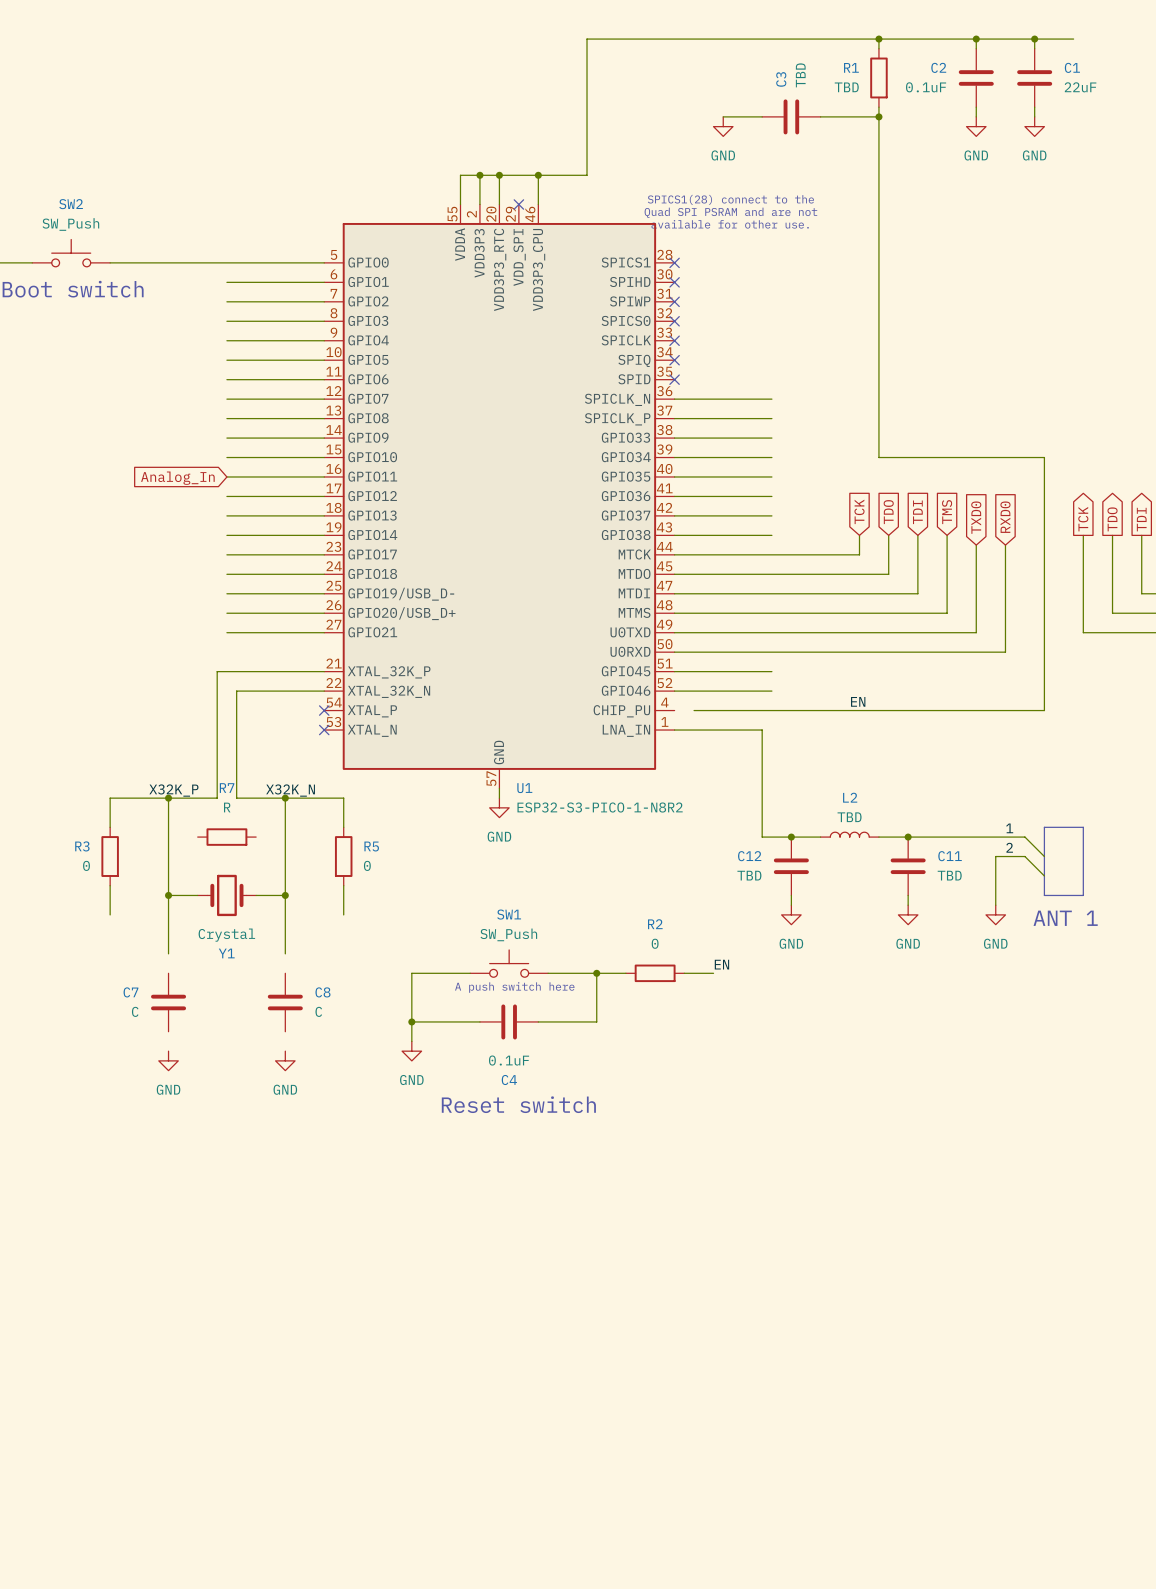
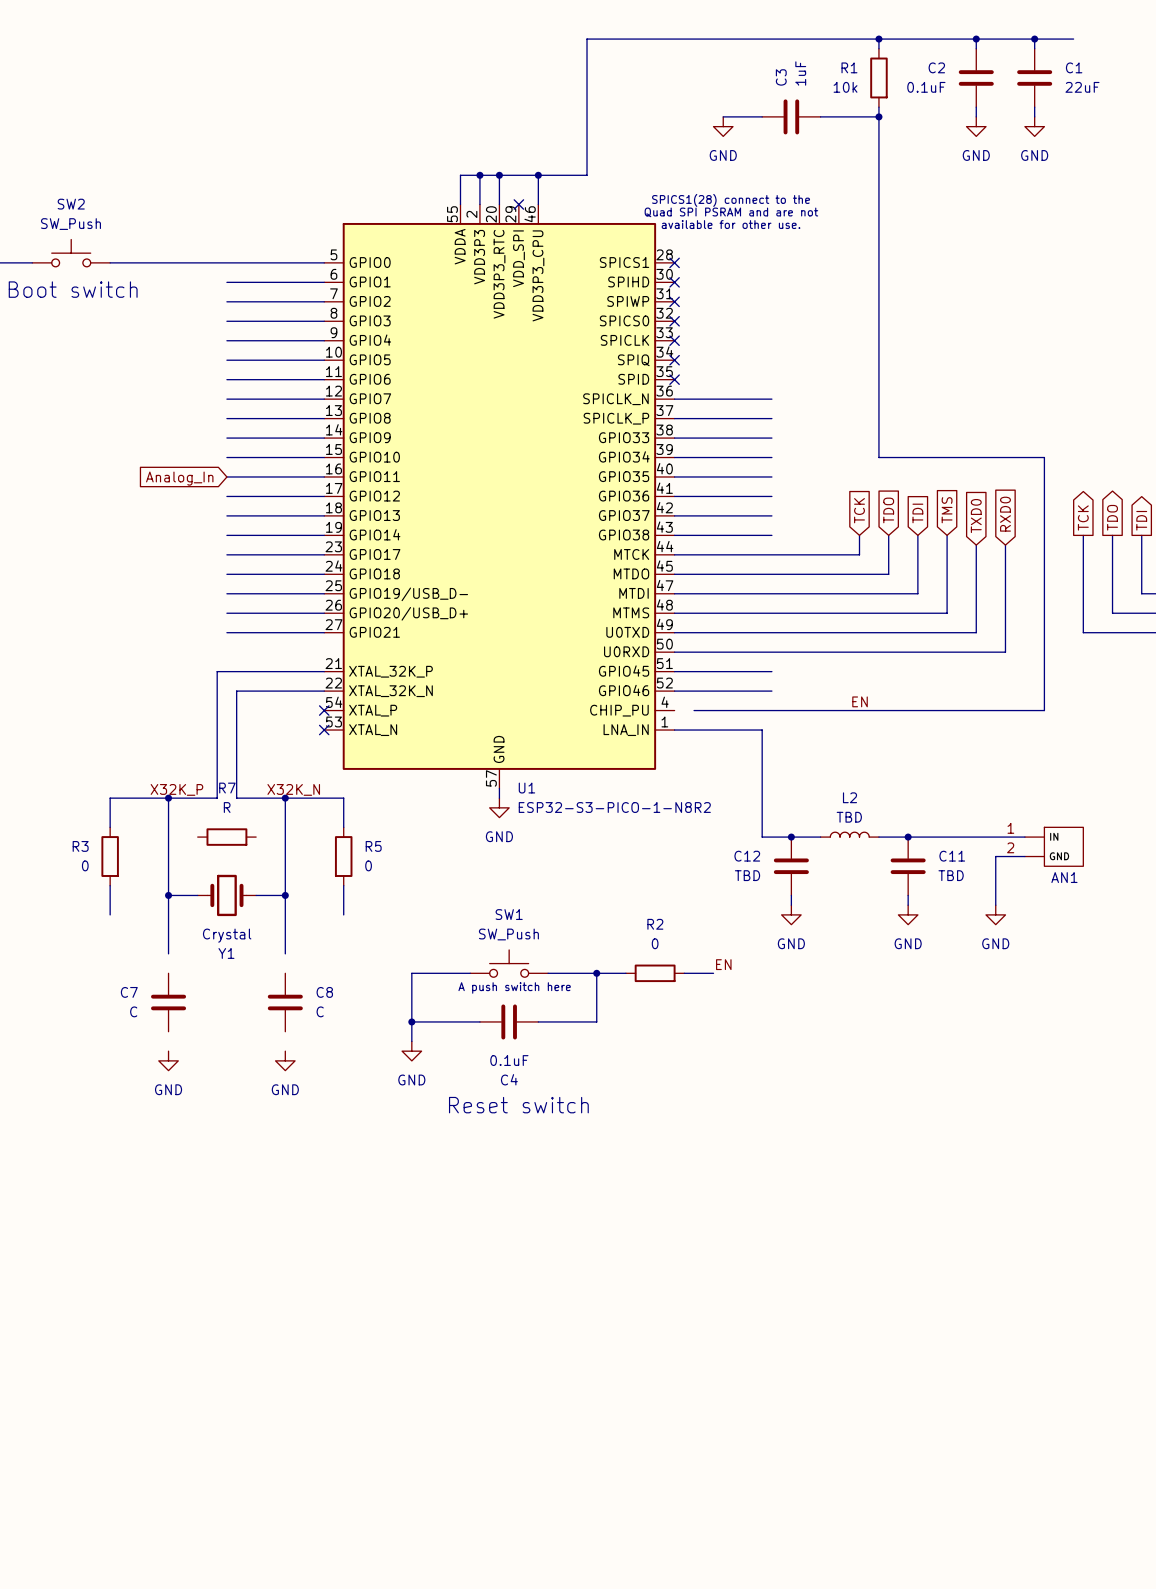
C3 value: TBD (800, 75) -> 1uF (800, 73)
R1 value: TBD (846, 87) -> 10k (845, 87)
bus: (1044, 827) (1044, 895) (1083, 895) (1083, 827) (1044, 827) -> none
wire: (1024, 837) (1044, 856) -> none
AN1: none -> (1054, 846)
wire: (1024, 856) (1044, 875) -> none
text: ANT 1 (1065, 918) -> none

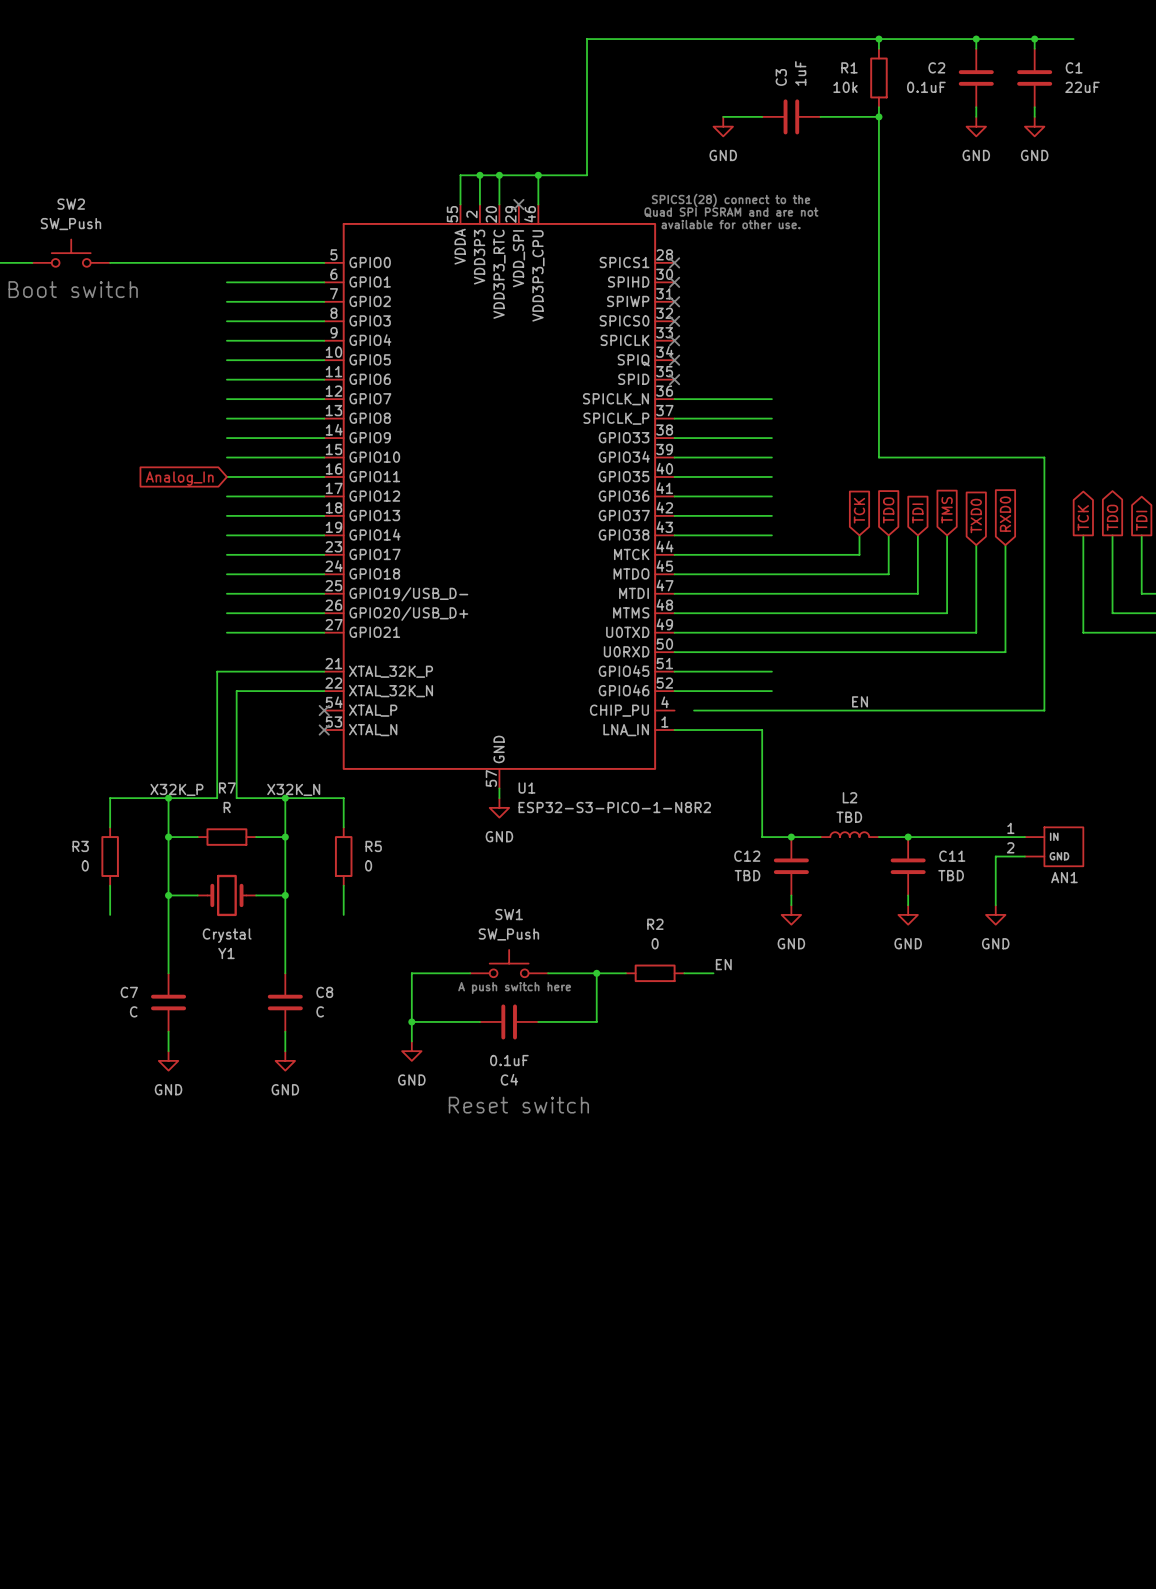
wire: none -> (168, 837) (197, 837)
junction: none -> (168, 837)
wire: none -> (256, 837) (285, 837)
junction: none -> (285, 837)
wire: none -> (168, 953) (168, 973)
wire: none -> (285, 953) (285, 973)
wire: none -> (168, 1031) (168, 1051)
wire: none -> (285, 1031) (285, 1051)

